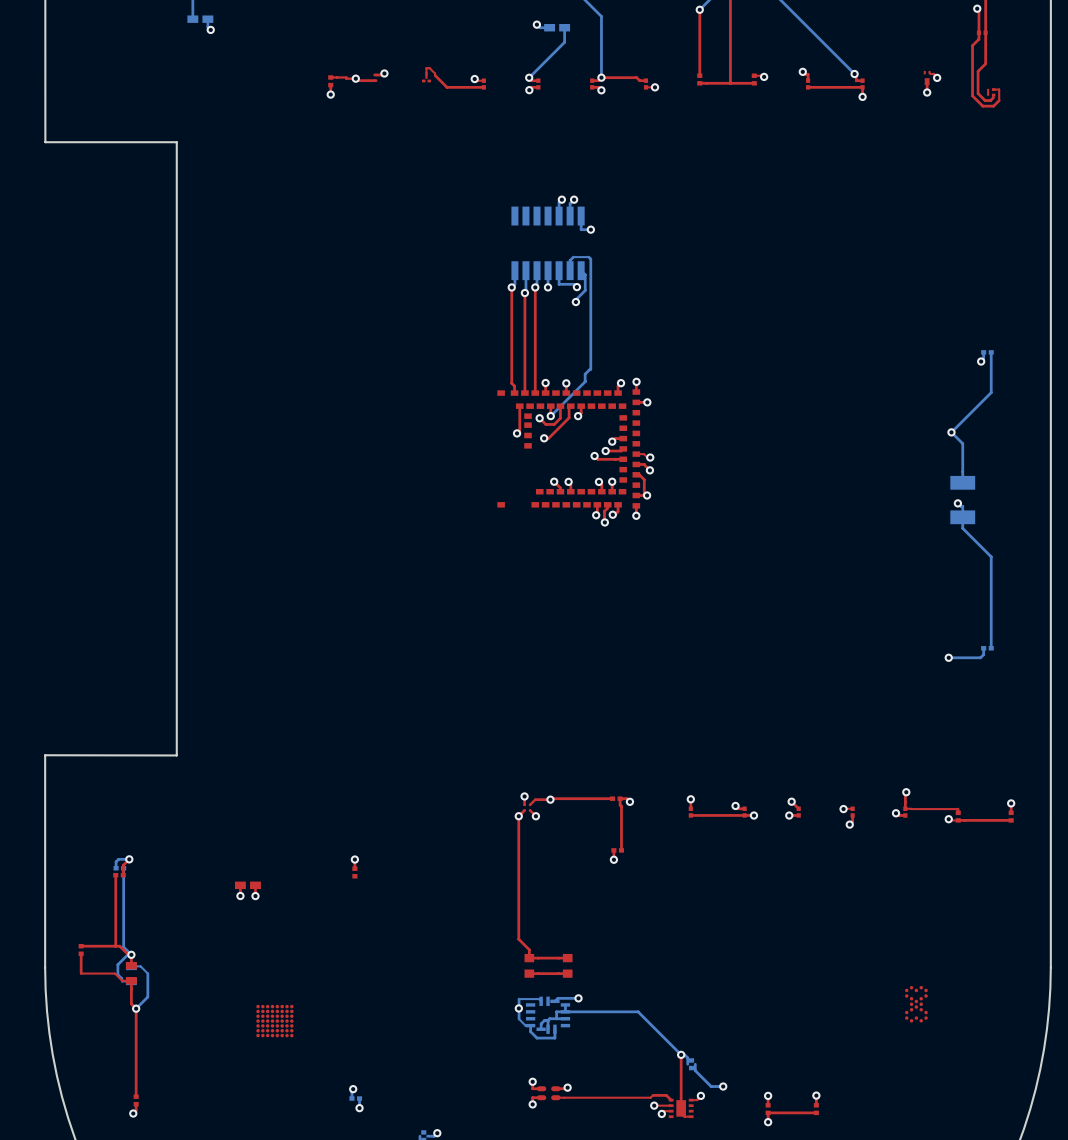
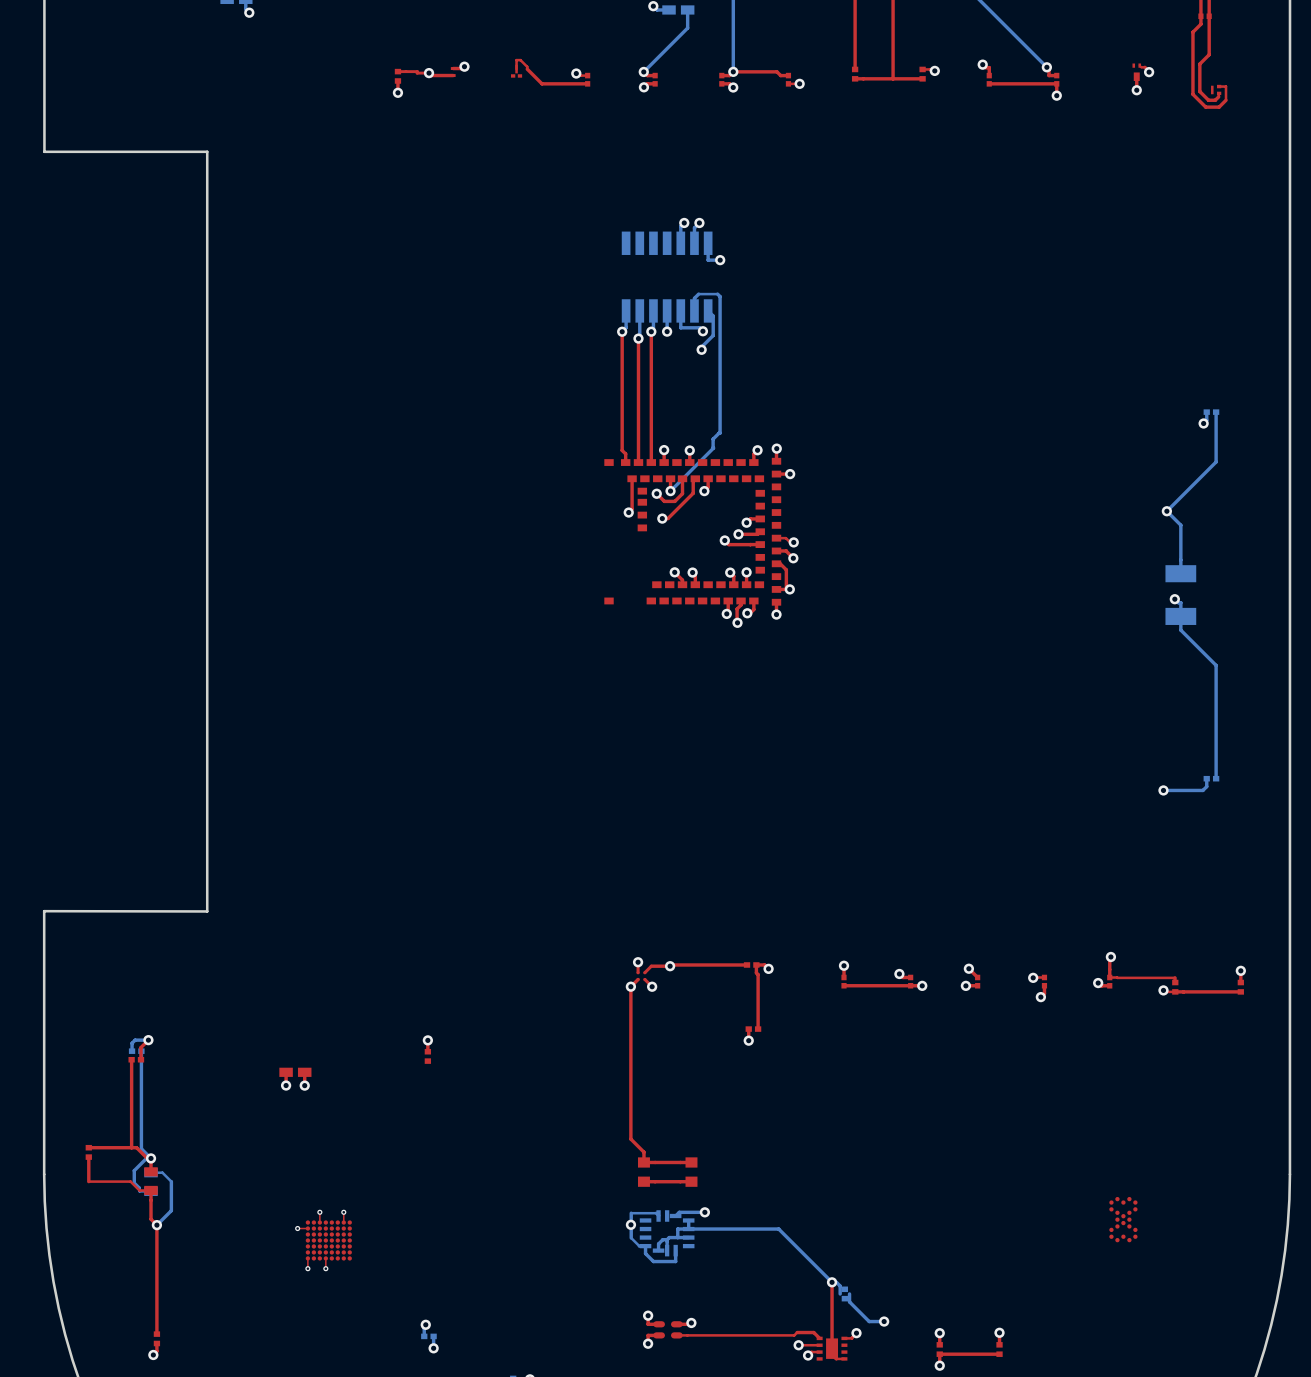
top track: none -> (319, 1212) (319, 1220)
via: none -> (319, 1212)
top track: none -> (343, 1212) (343, 1220)
via: none -> (343, 1212)
top track: none -> (297, 1228) (305, 1228)
via: none -> (297, 1228)
top track: none -> (307, 1260) (307, 1268)
top track: none -> (325, 1260) (325, 1268)
via: none -> (307, 1268)
via: none -> (325, 1268)

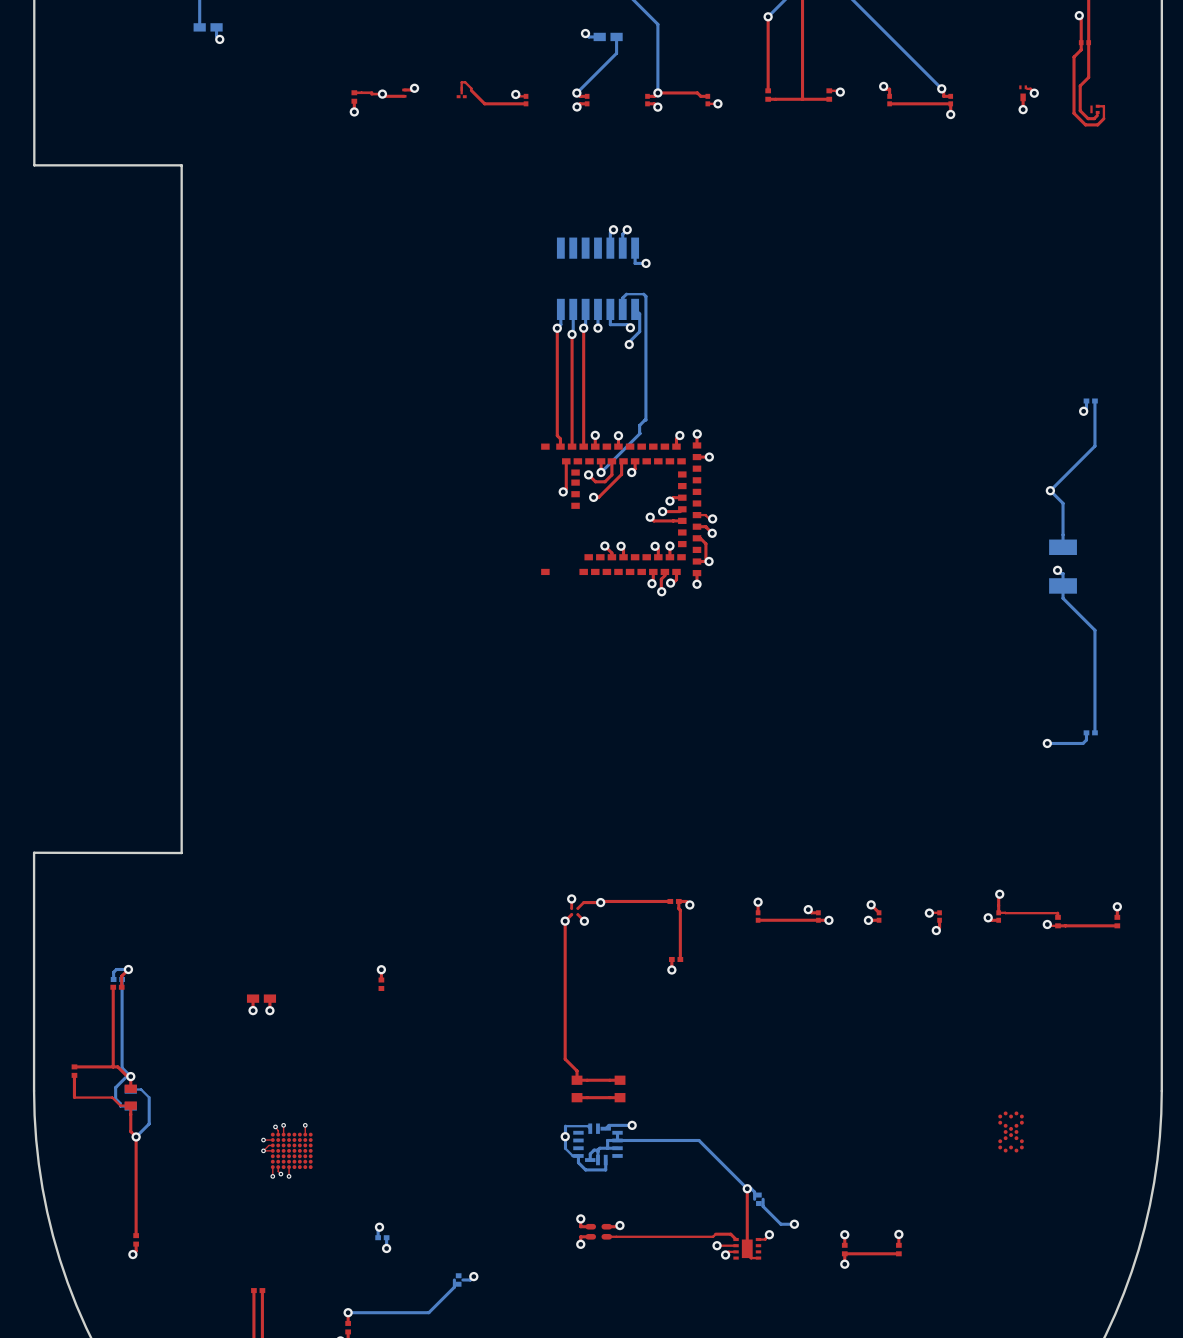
top track: none -> (275, 1126) (278, 1132)
via: none -> (275, 1126)
top track: none -> (270, 1145) (263, 1150) (270, 1150)
via: none -> (263, 1150)
top track: none -> (278, 1169) (280, 1174)
via: none -> (280, 1174)

